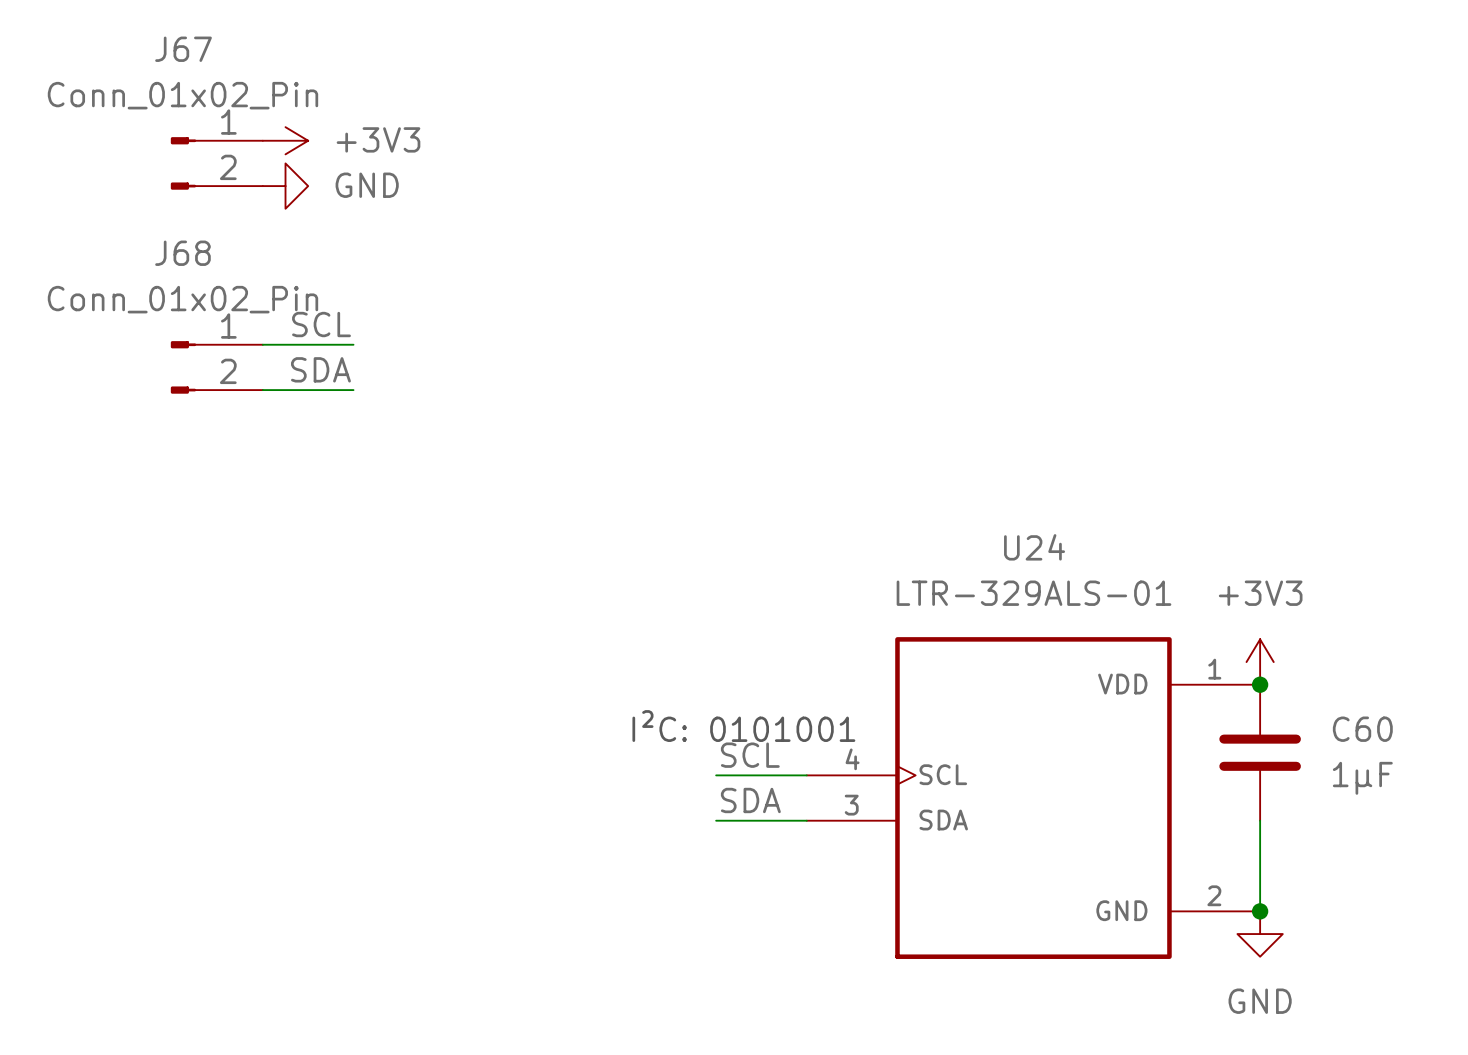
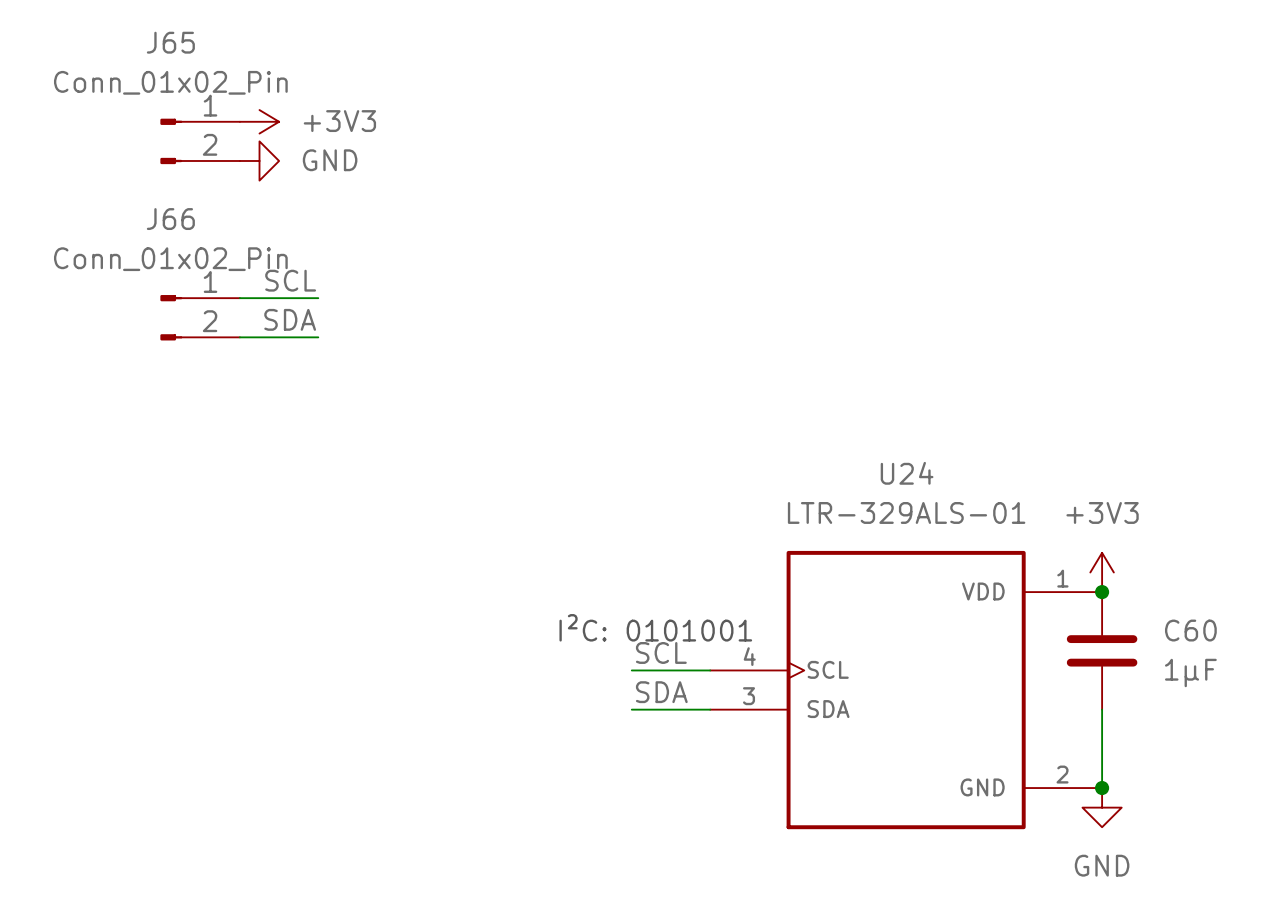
J67 name: J67 (183, 49) -> J65 (170, 42)
J68 name: J68 (182, 253) -> J66 (170, 219)

